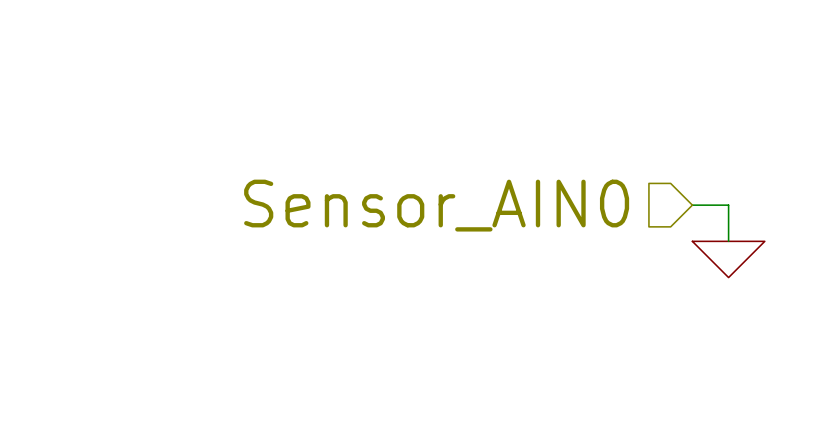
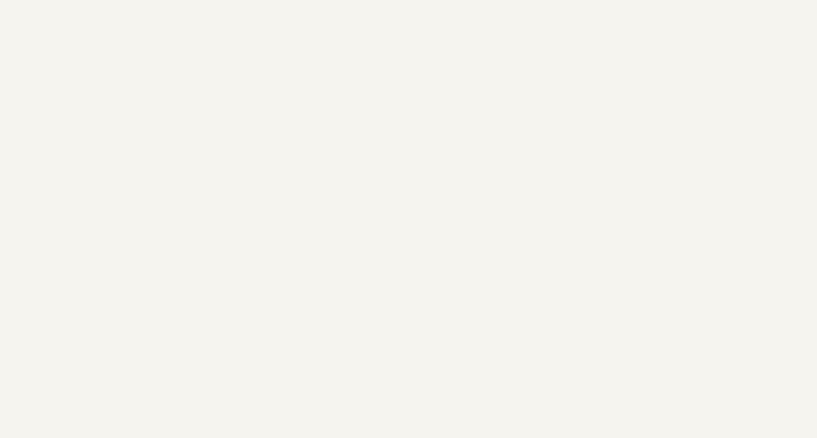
hierarchical label: Sensor_AIN0 (436, 205) -> none
wire: (692, 205) (728, 205) (728, 241) -> none
power symbol: (728, 259) -> none

